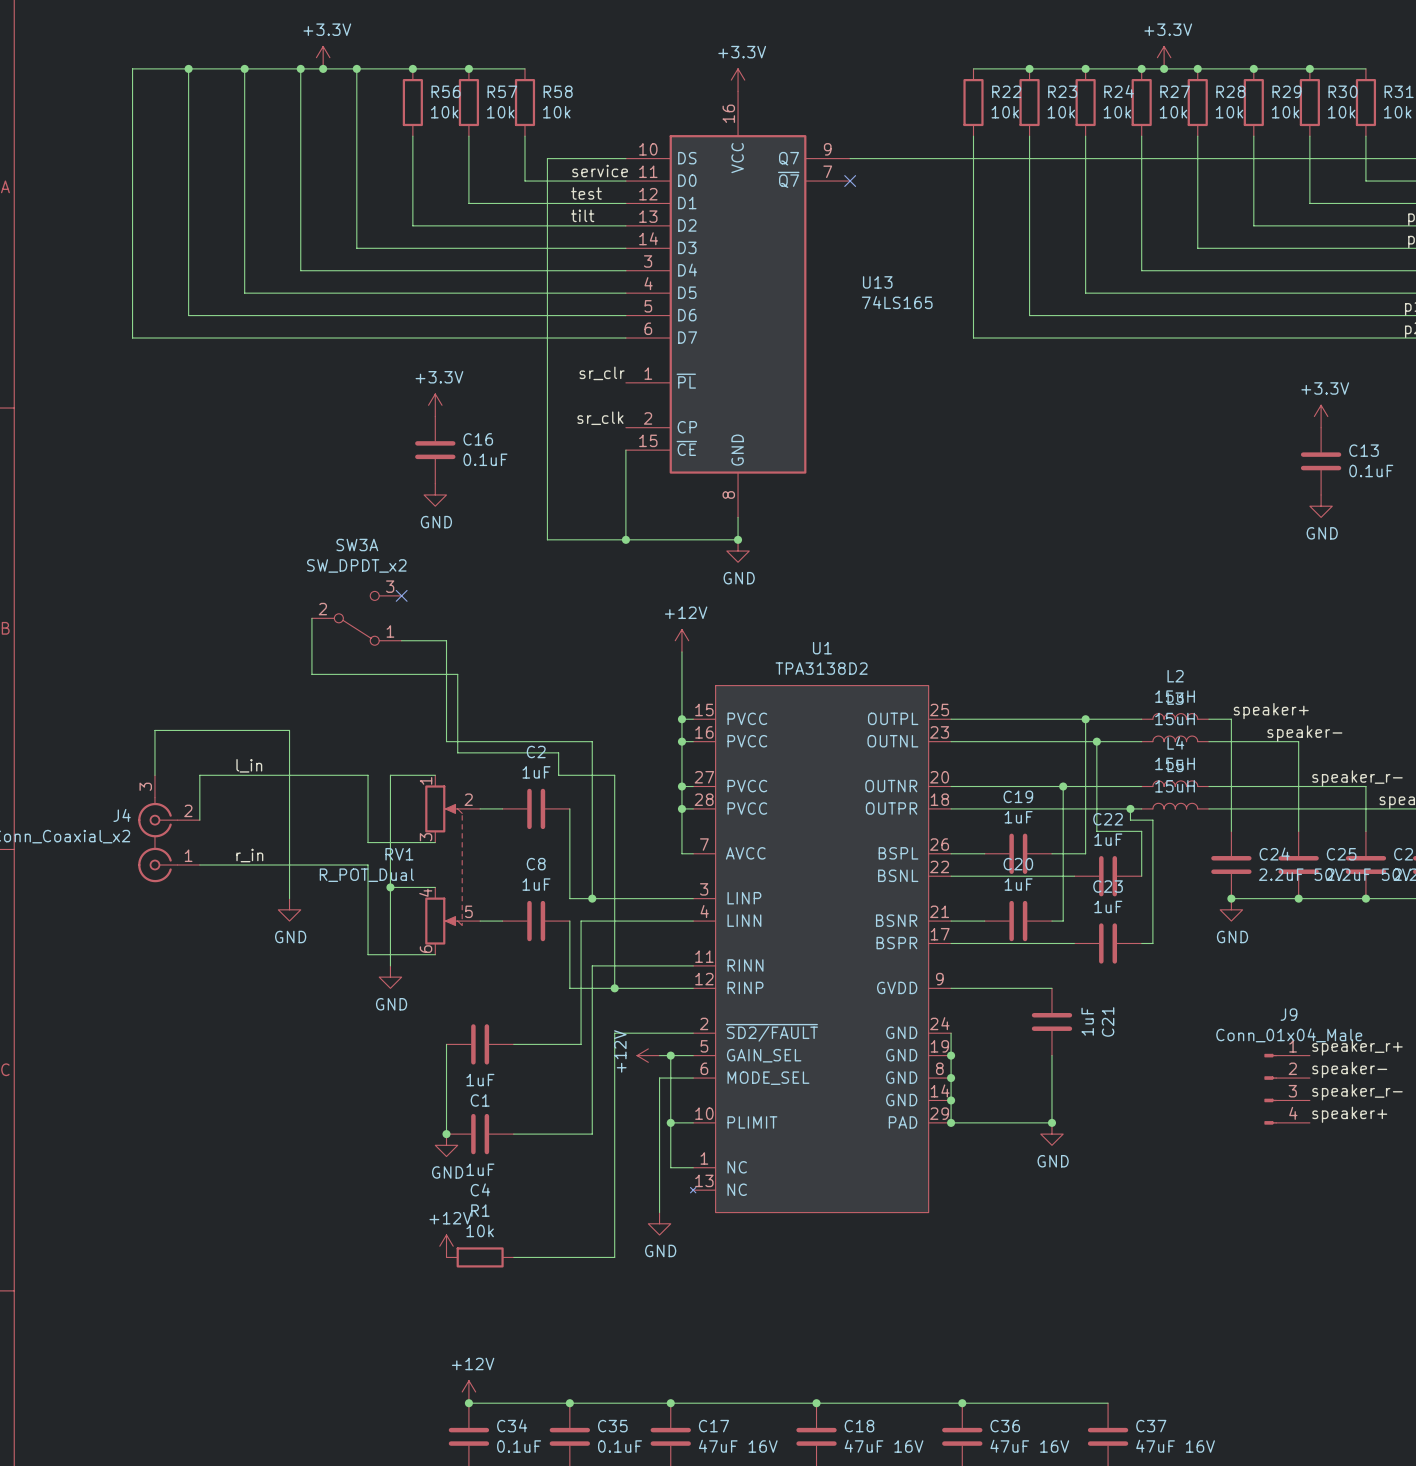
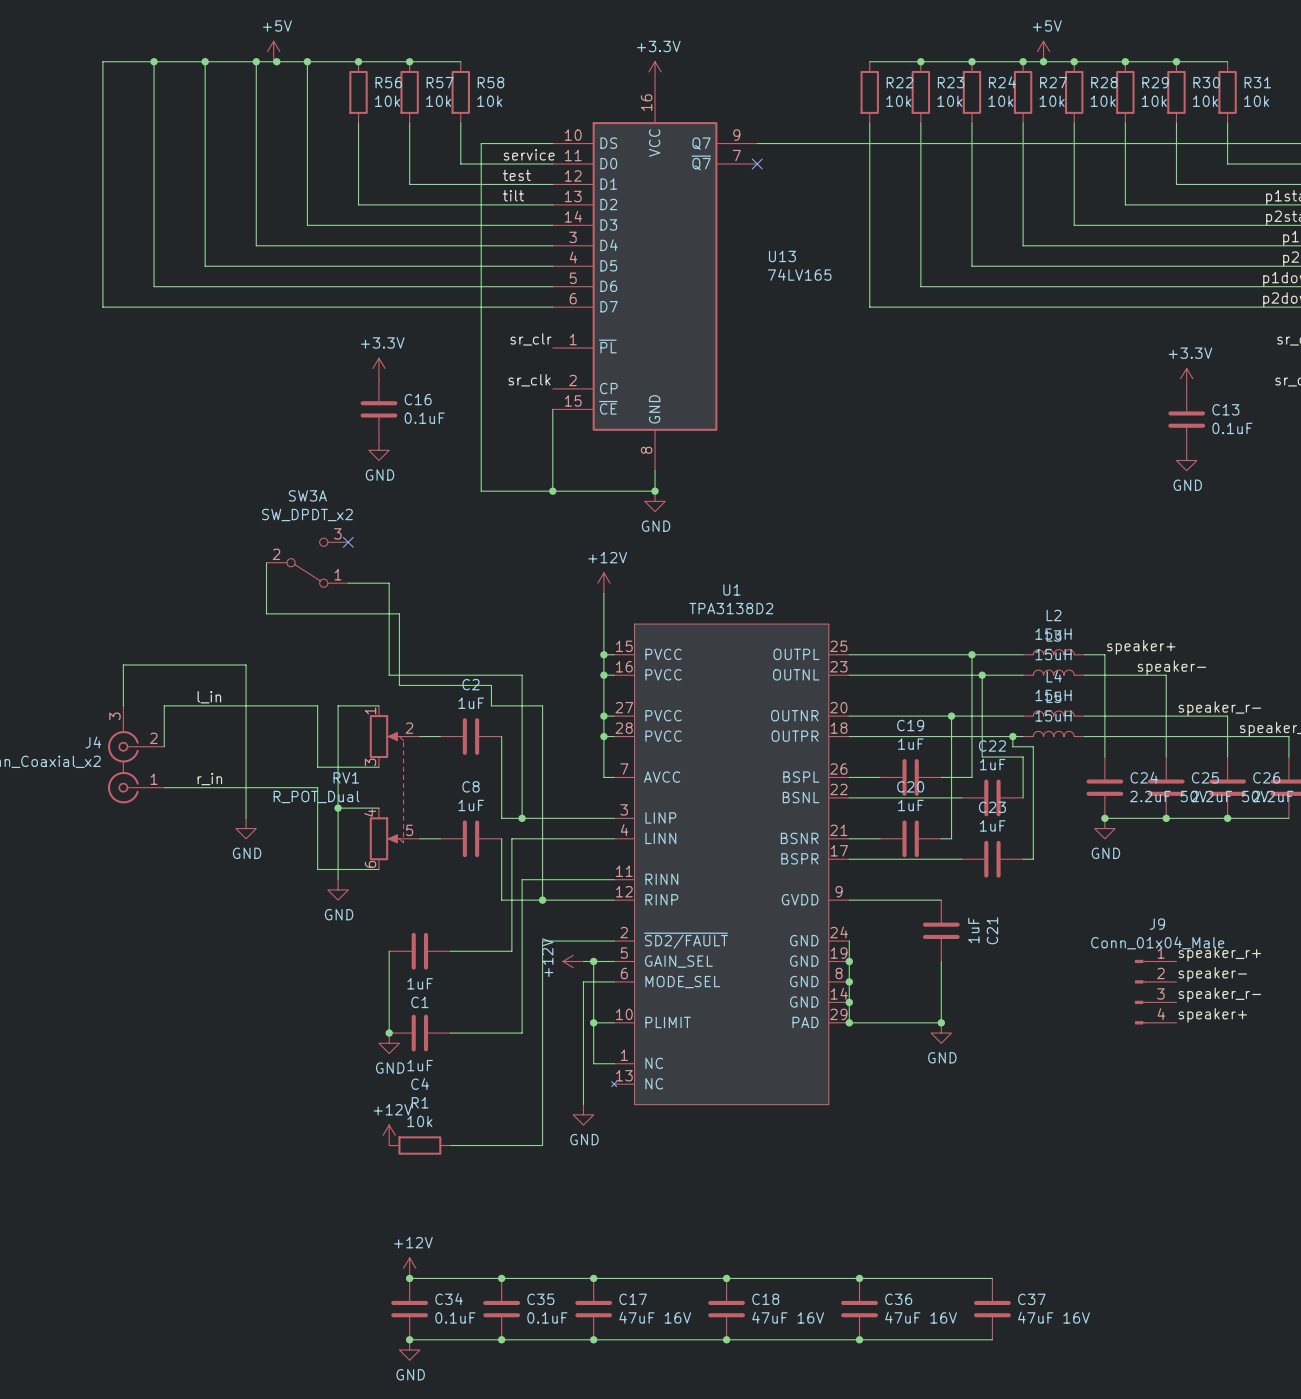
power symbol: +3.3V (323, 57) -> +5V (273, 51)
power symbol: +3.3V (1164, 57) -> +5V (1043, 51)
U13 value: 74LS165 (897, 302) -> 74LV165 (799, 274)

